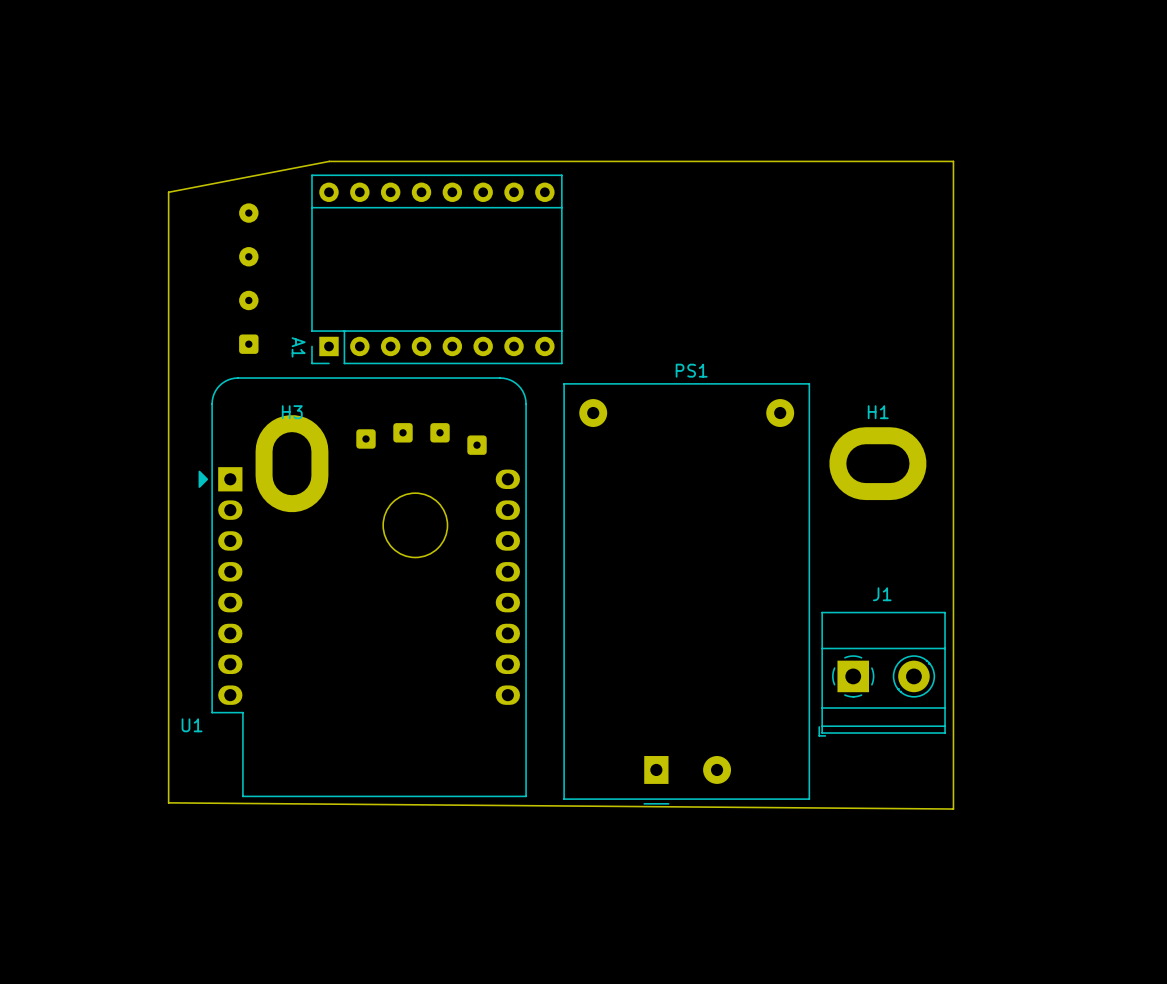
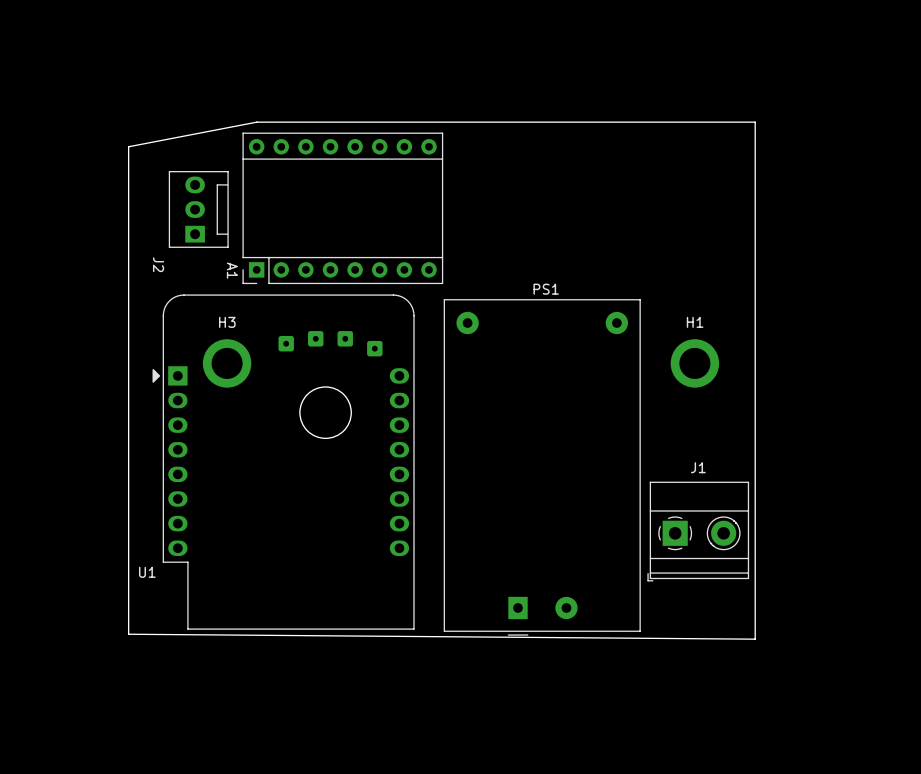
J2: none -> (198, 209)
part: (248, 278) -> none
H3 footprint: [255, 415, 329, 513] -> [202, 339, 252, 388]
H1 footprint: [829, 427, 927, 501] -> [670, 339, 720, 388]

